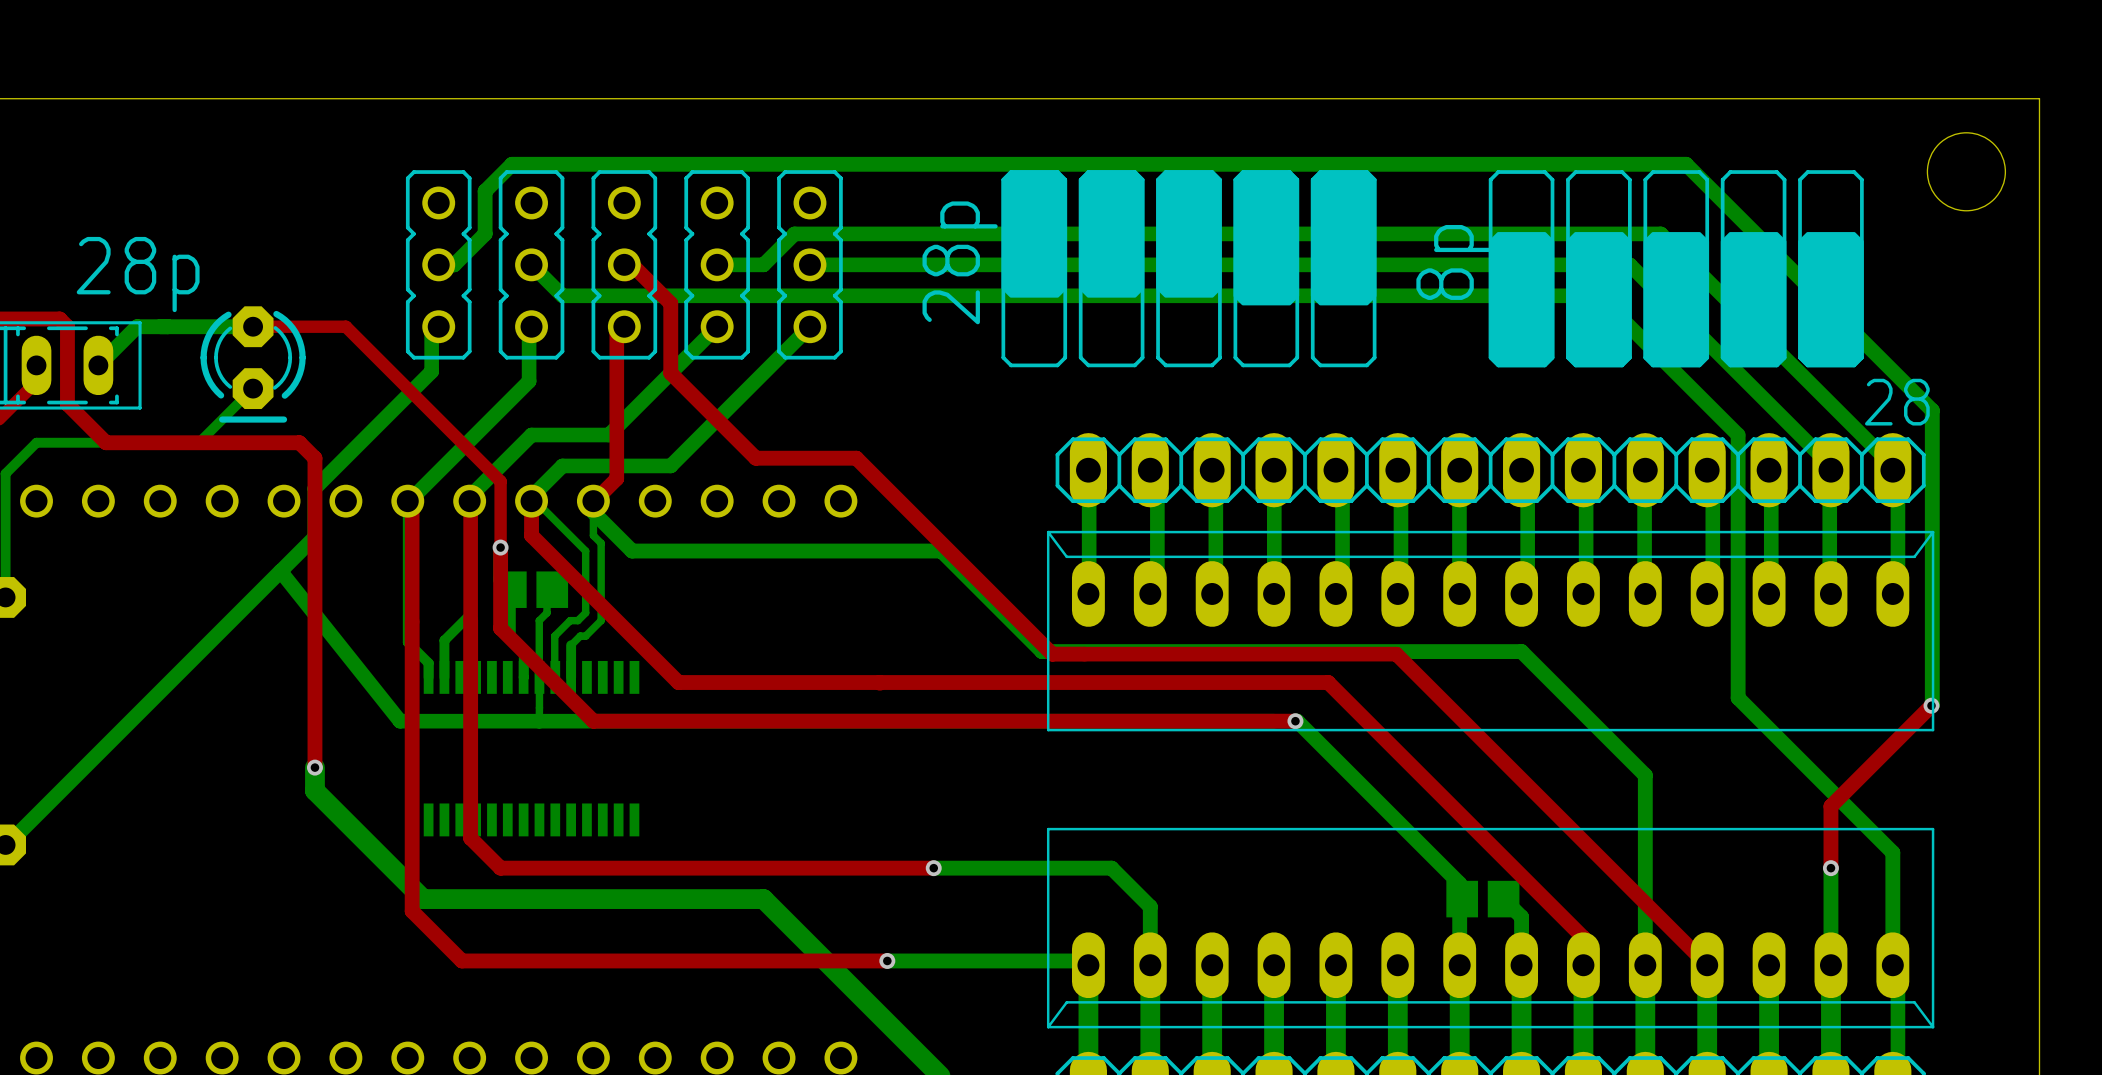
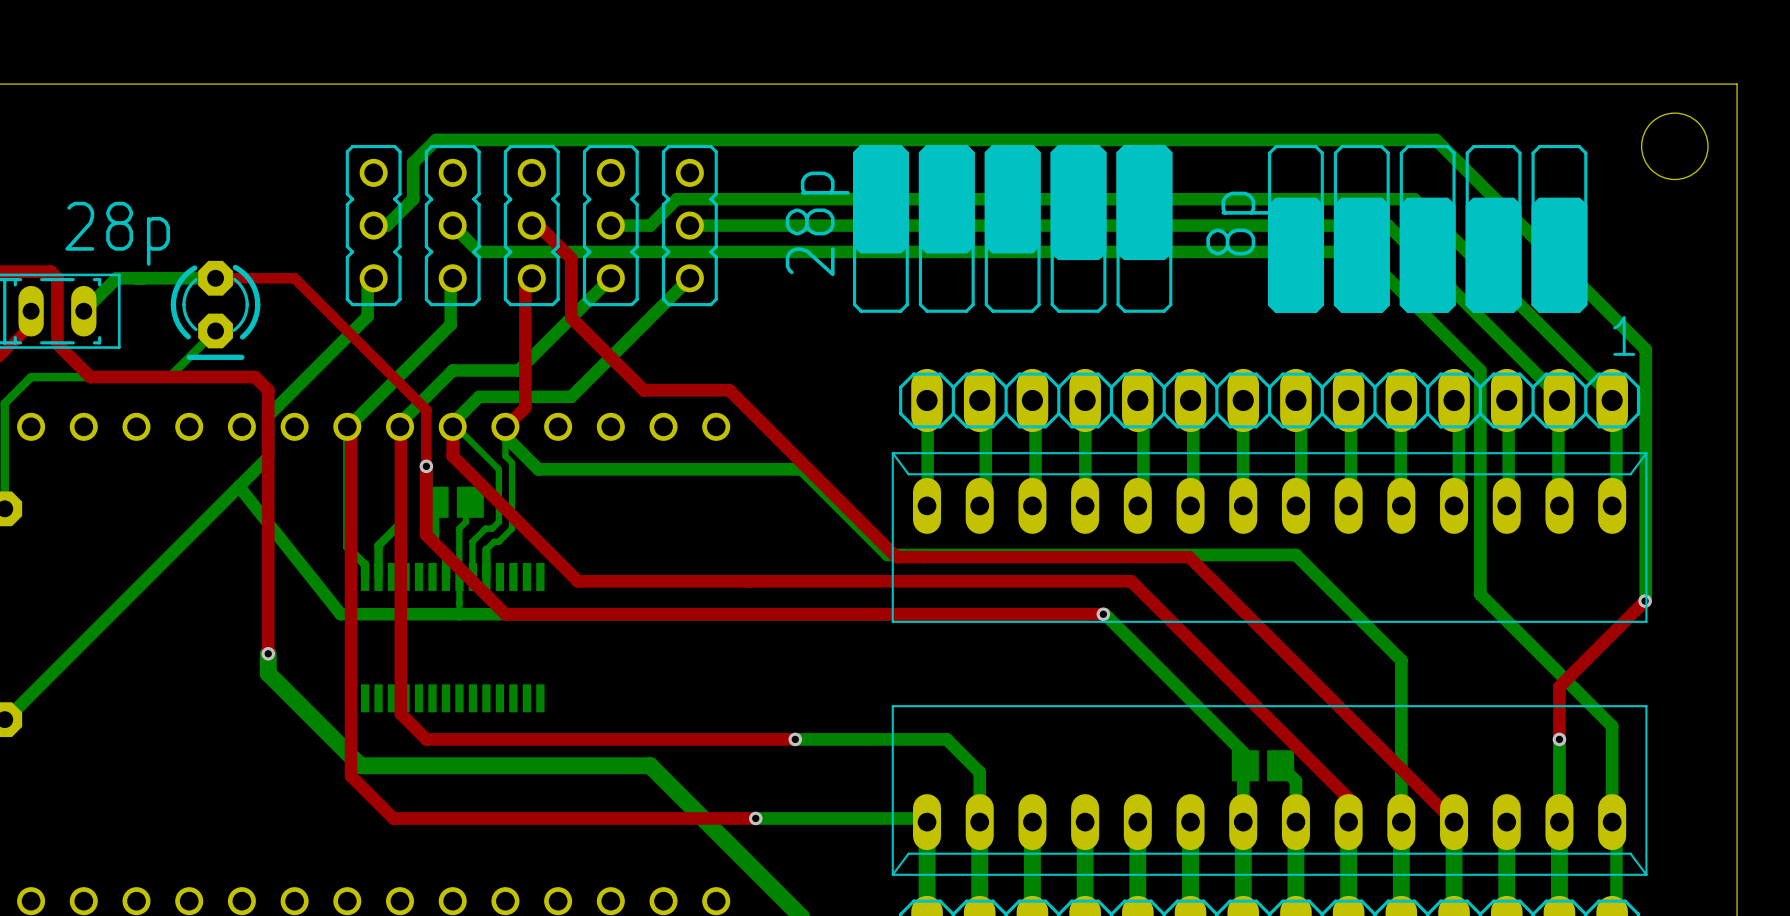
text: none -> 1 (1624, 335)
text: 28 (1897, 402) -> none

